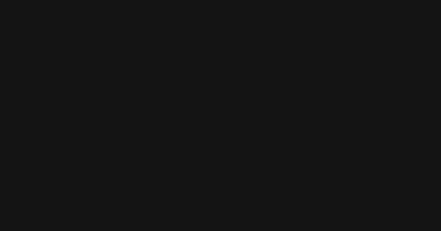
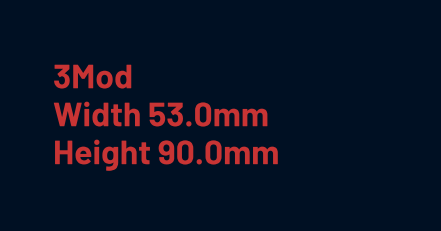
text: none -> 3Mod (92, 76)
text: none -> Width 53.0mm (160, 114)
text: none -> Height 90.0mm (166, 155)

